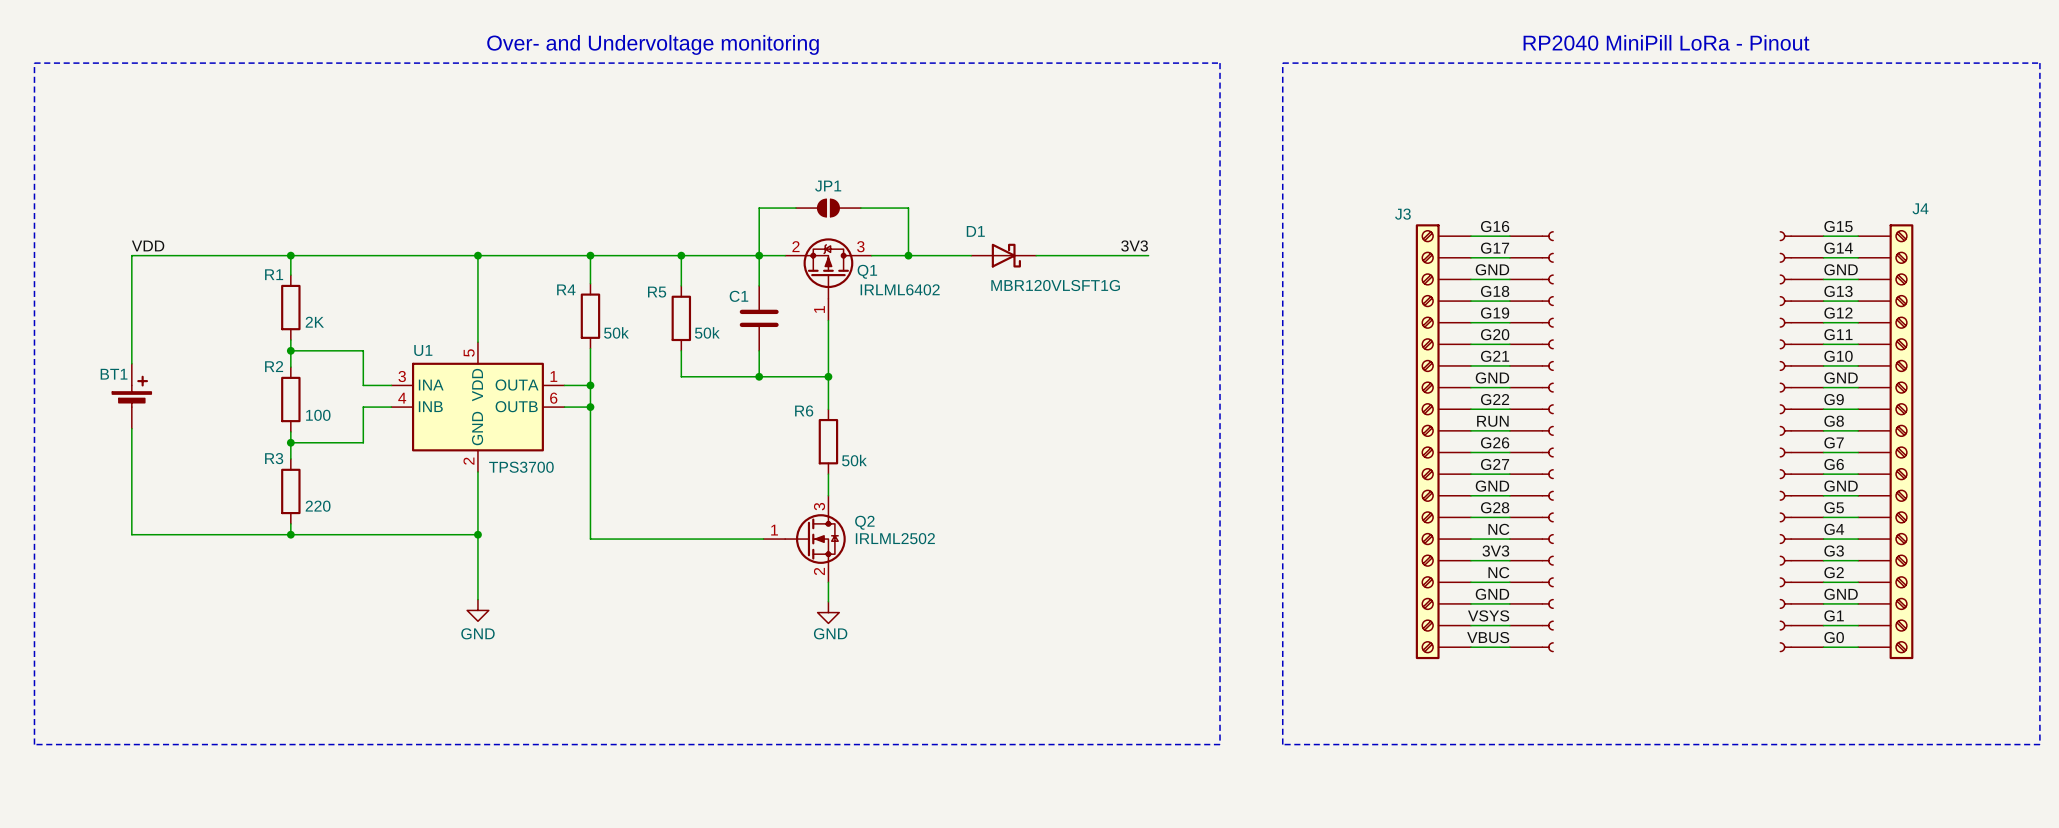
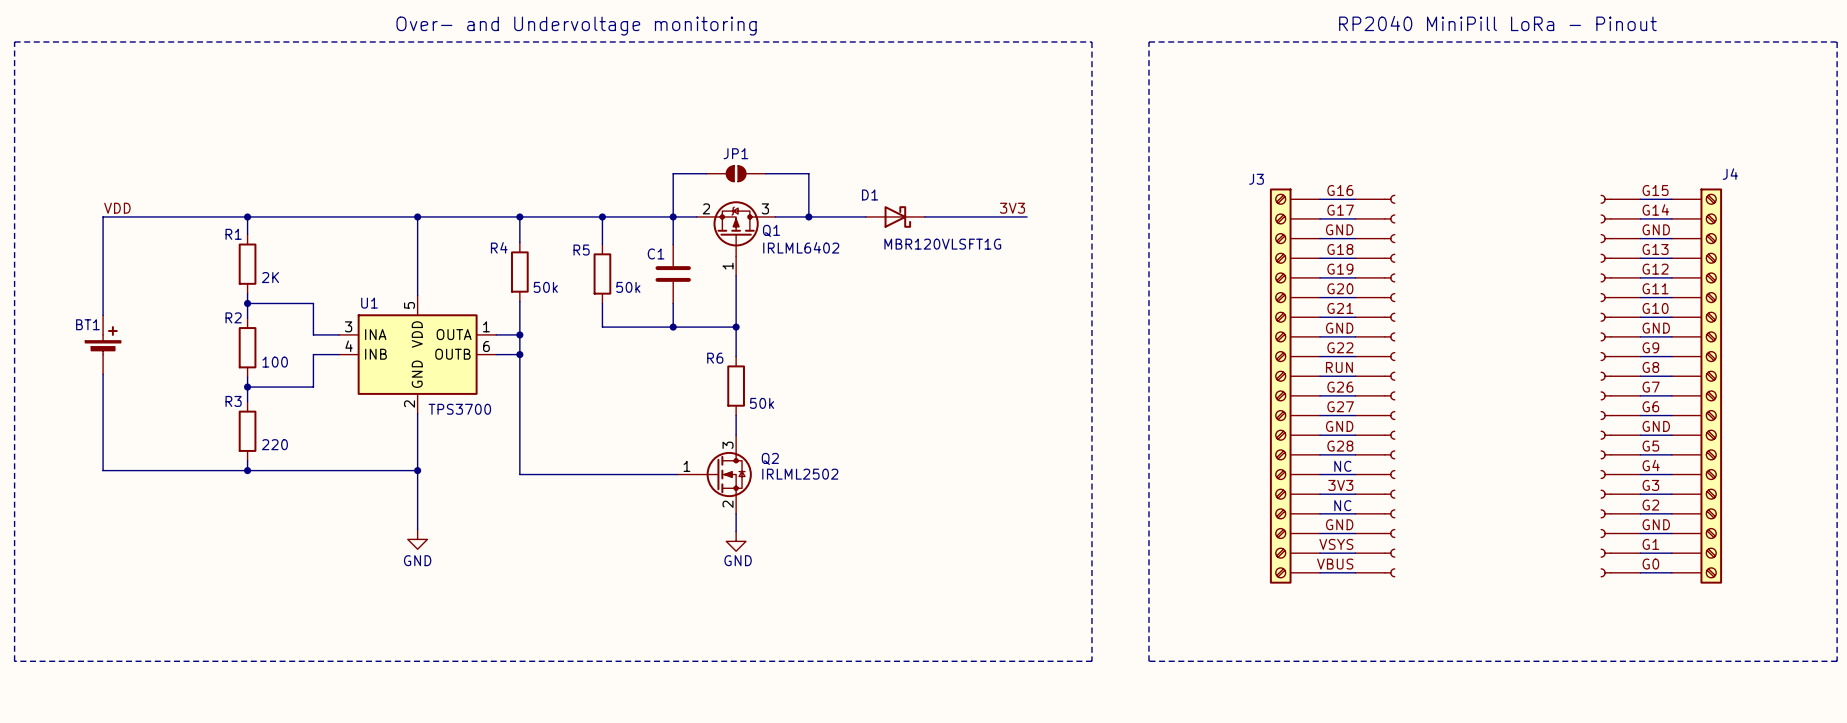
label: NC (1498, 529) -> none
text: none -> NC (1342, 466)
label: NC (1498, 572) -> none
text: none -> NC (1342, 505)

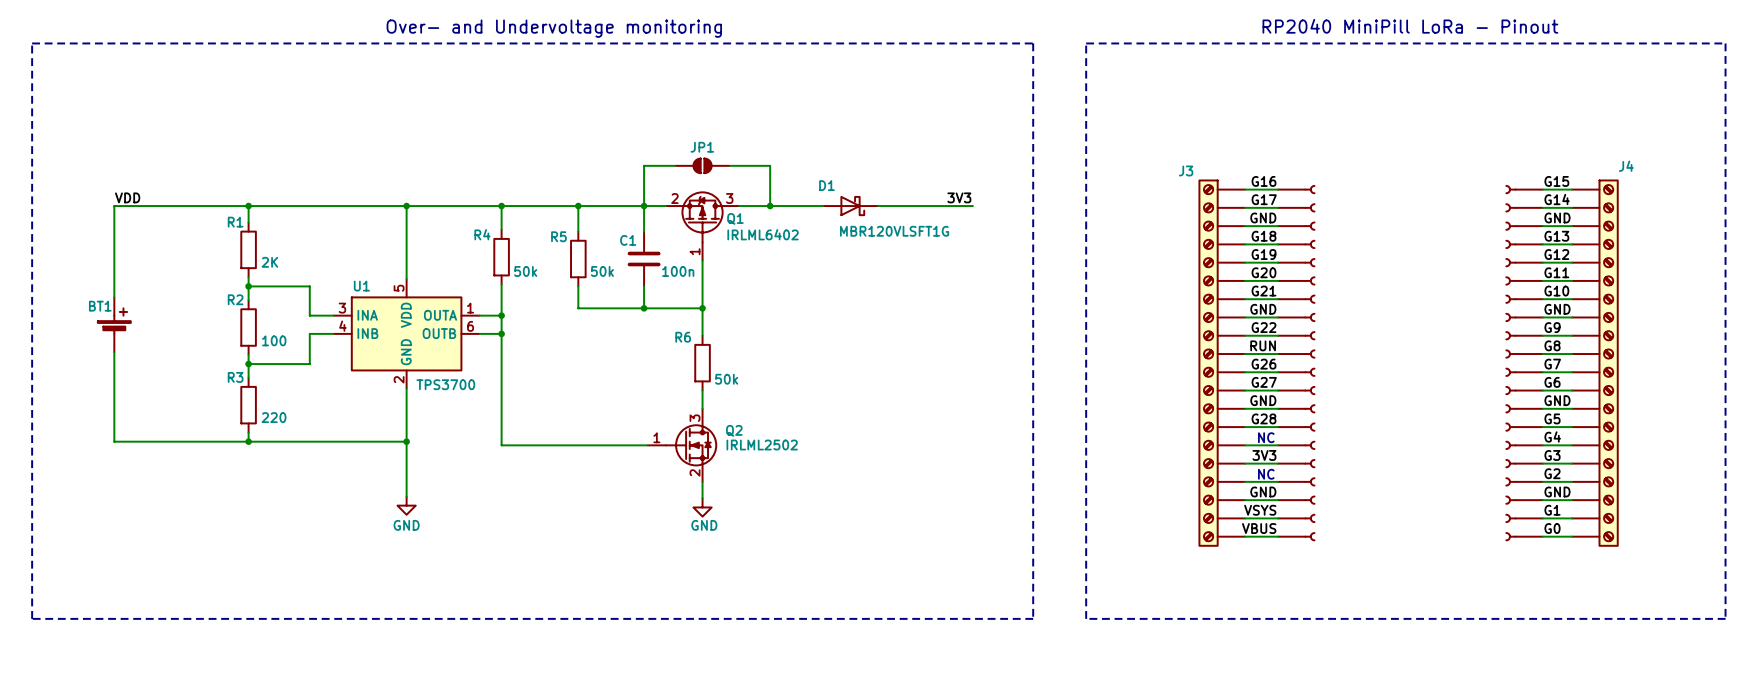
C1 value: none -> 100n (678, 271)

